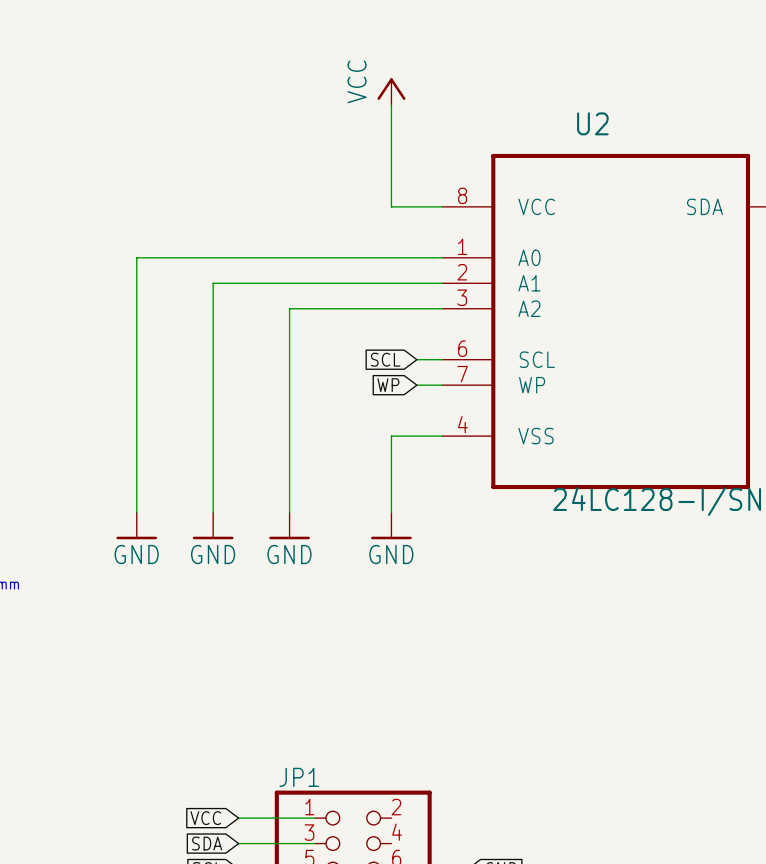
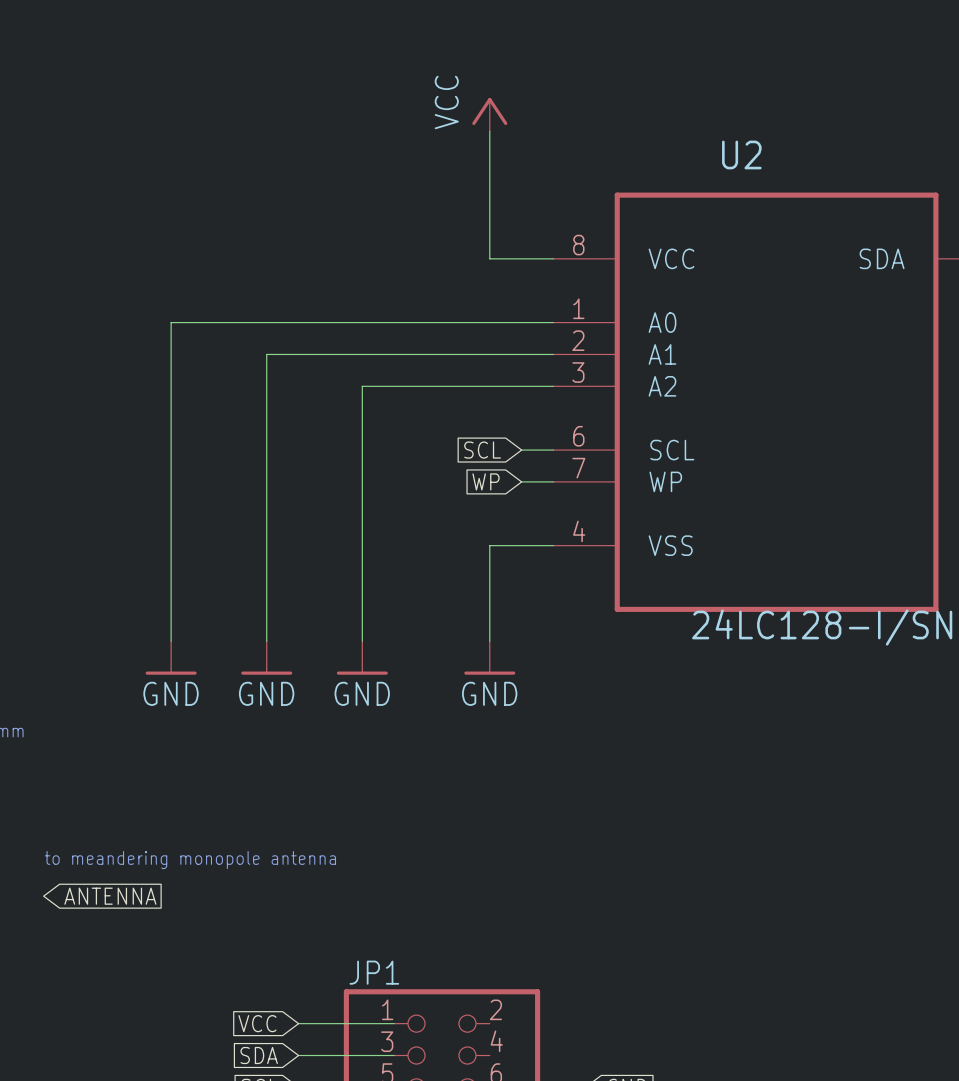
text: none -> to meandering monopole antenna (190, 860)
global label: none -> ANTENNA (110, 896)

